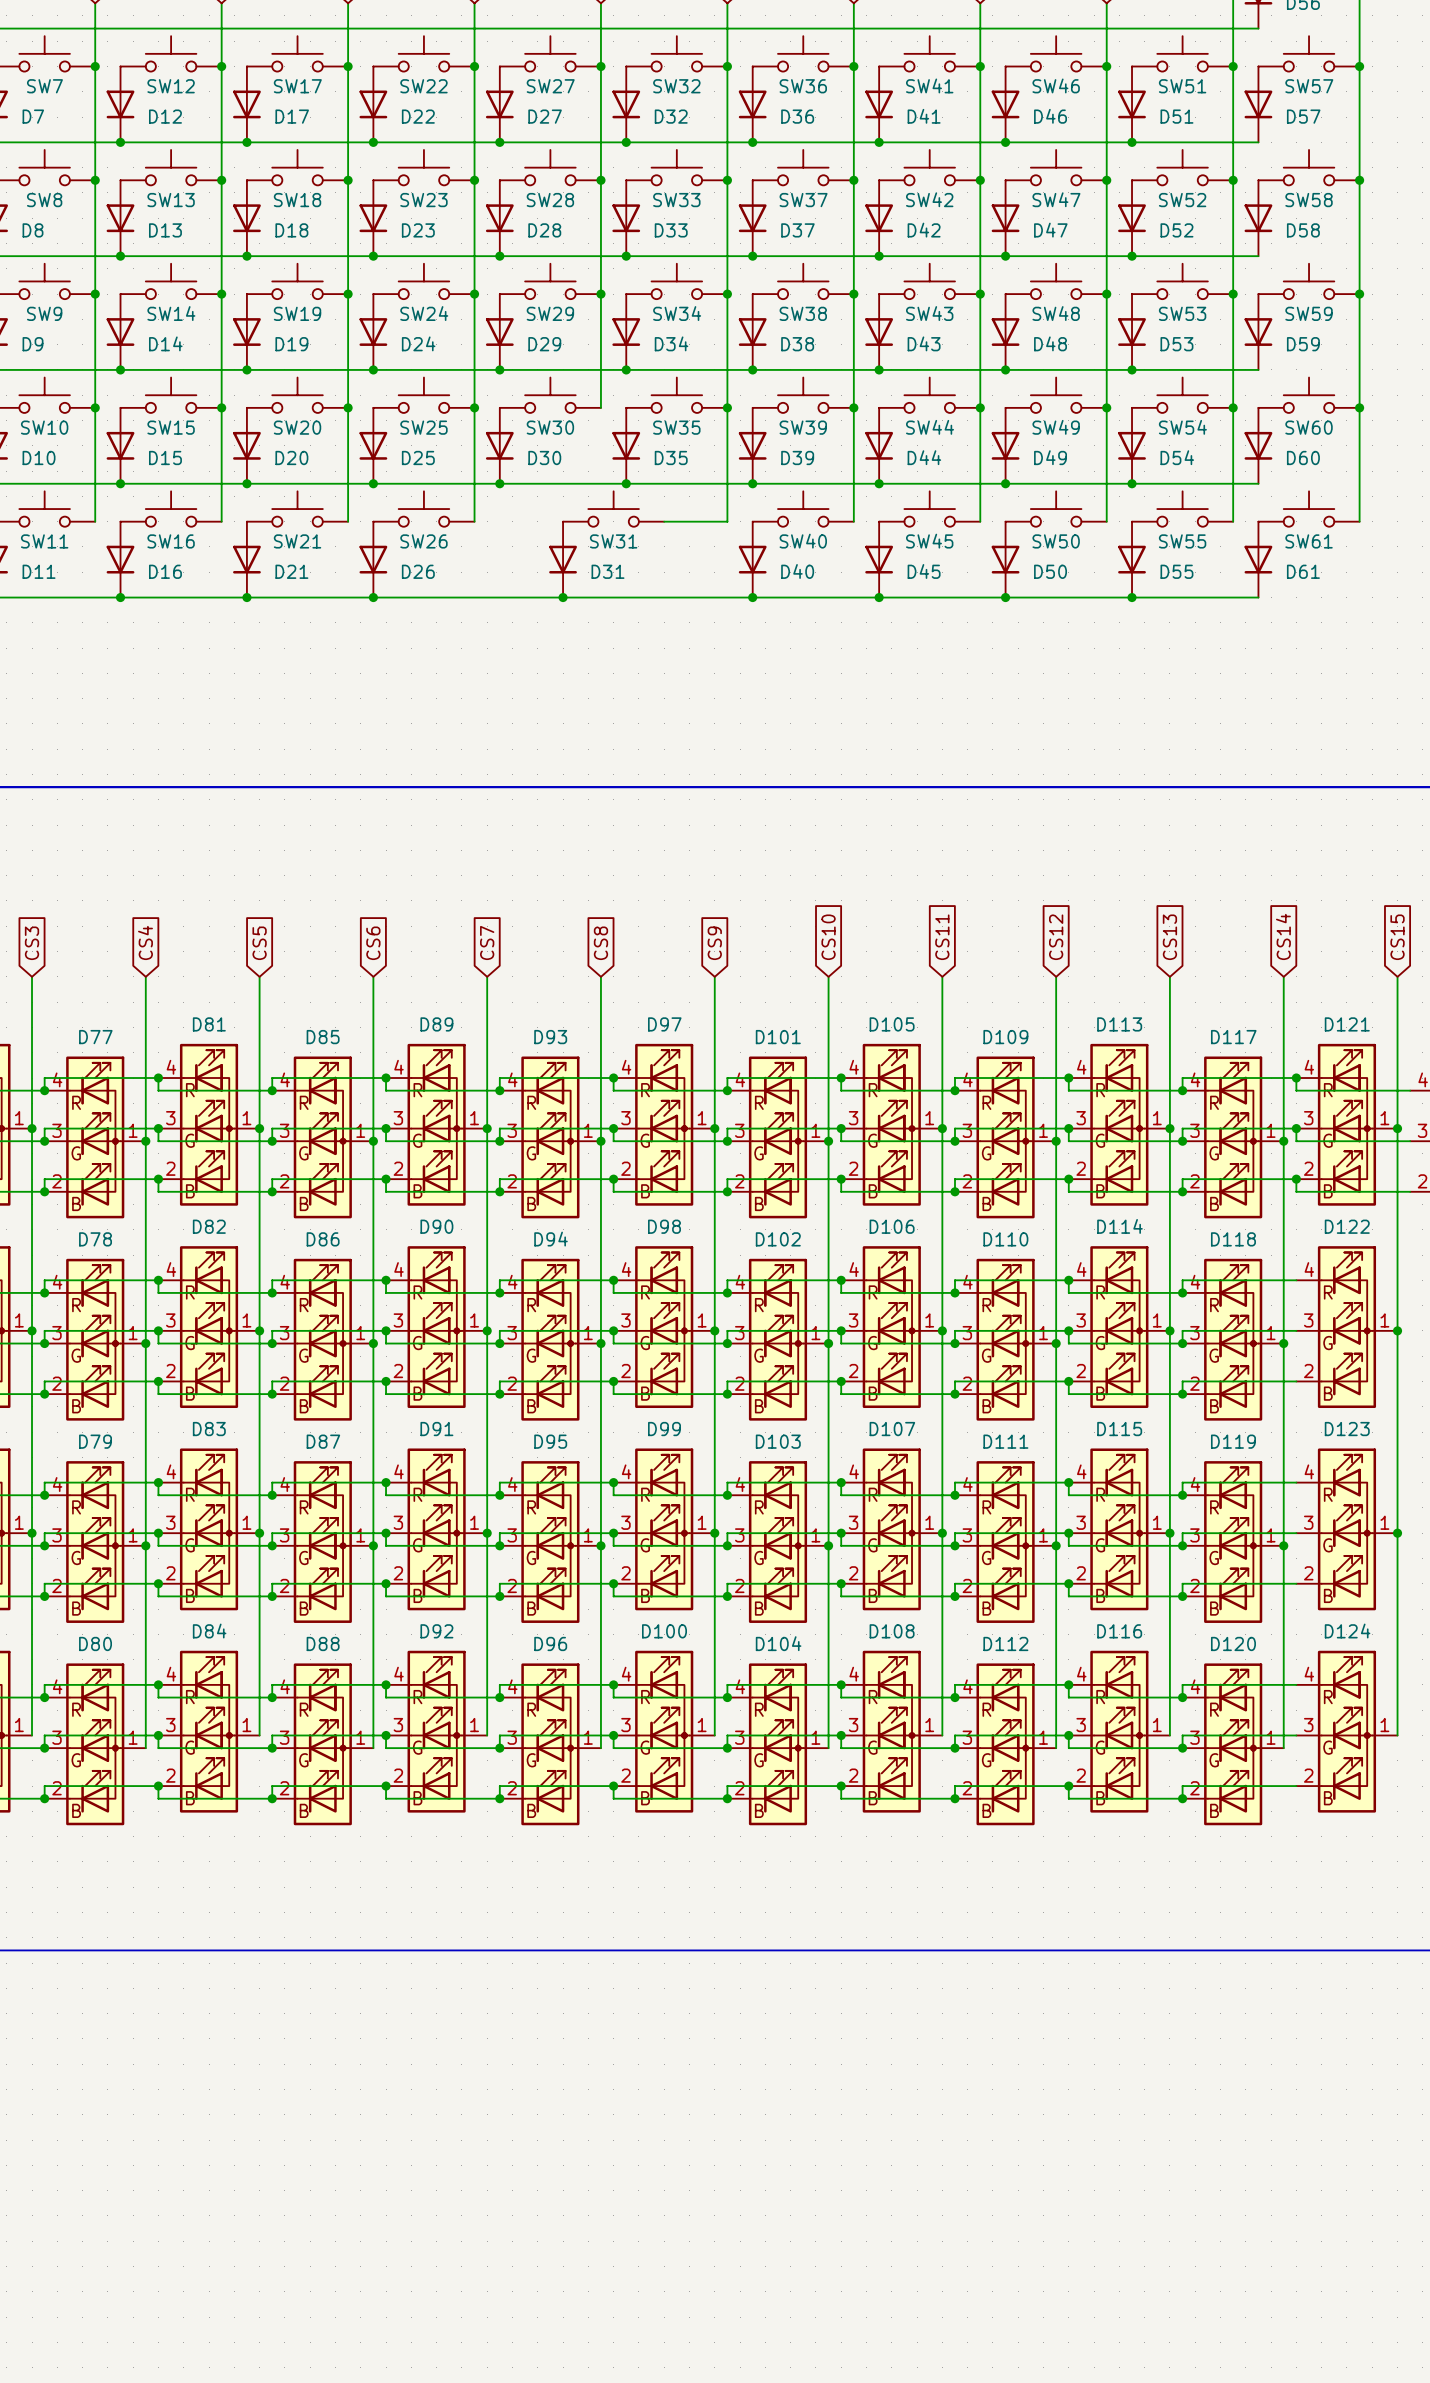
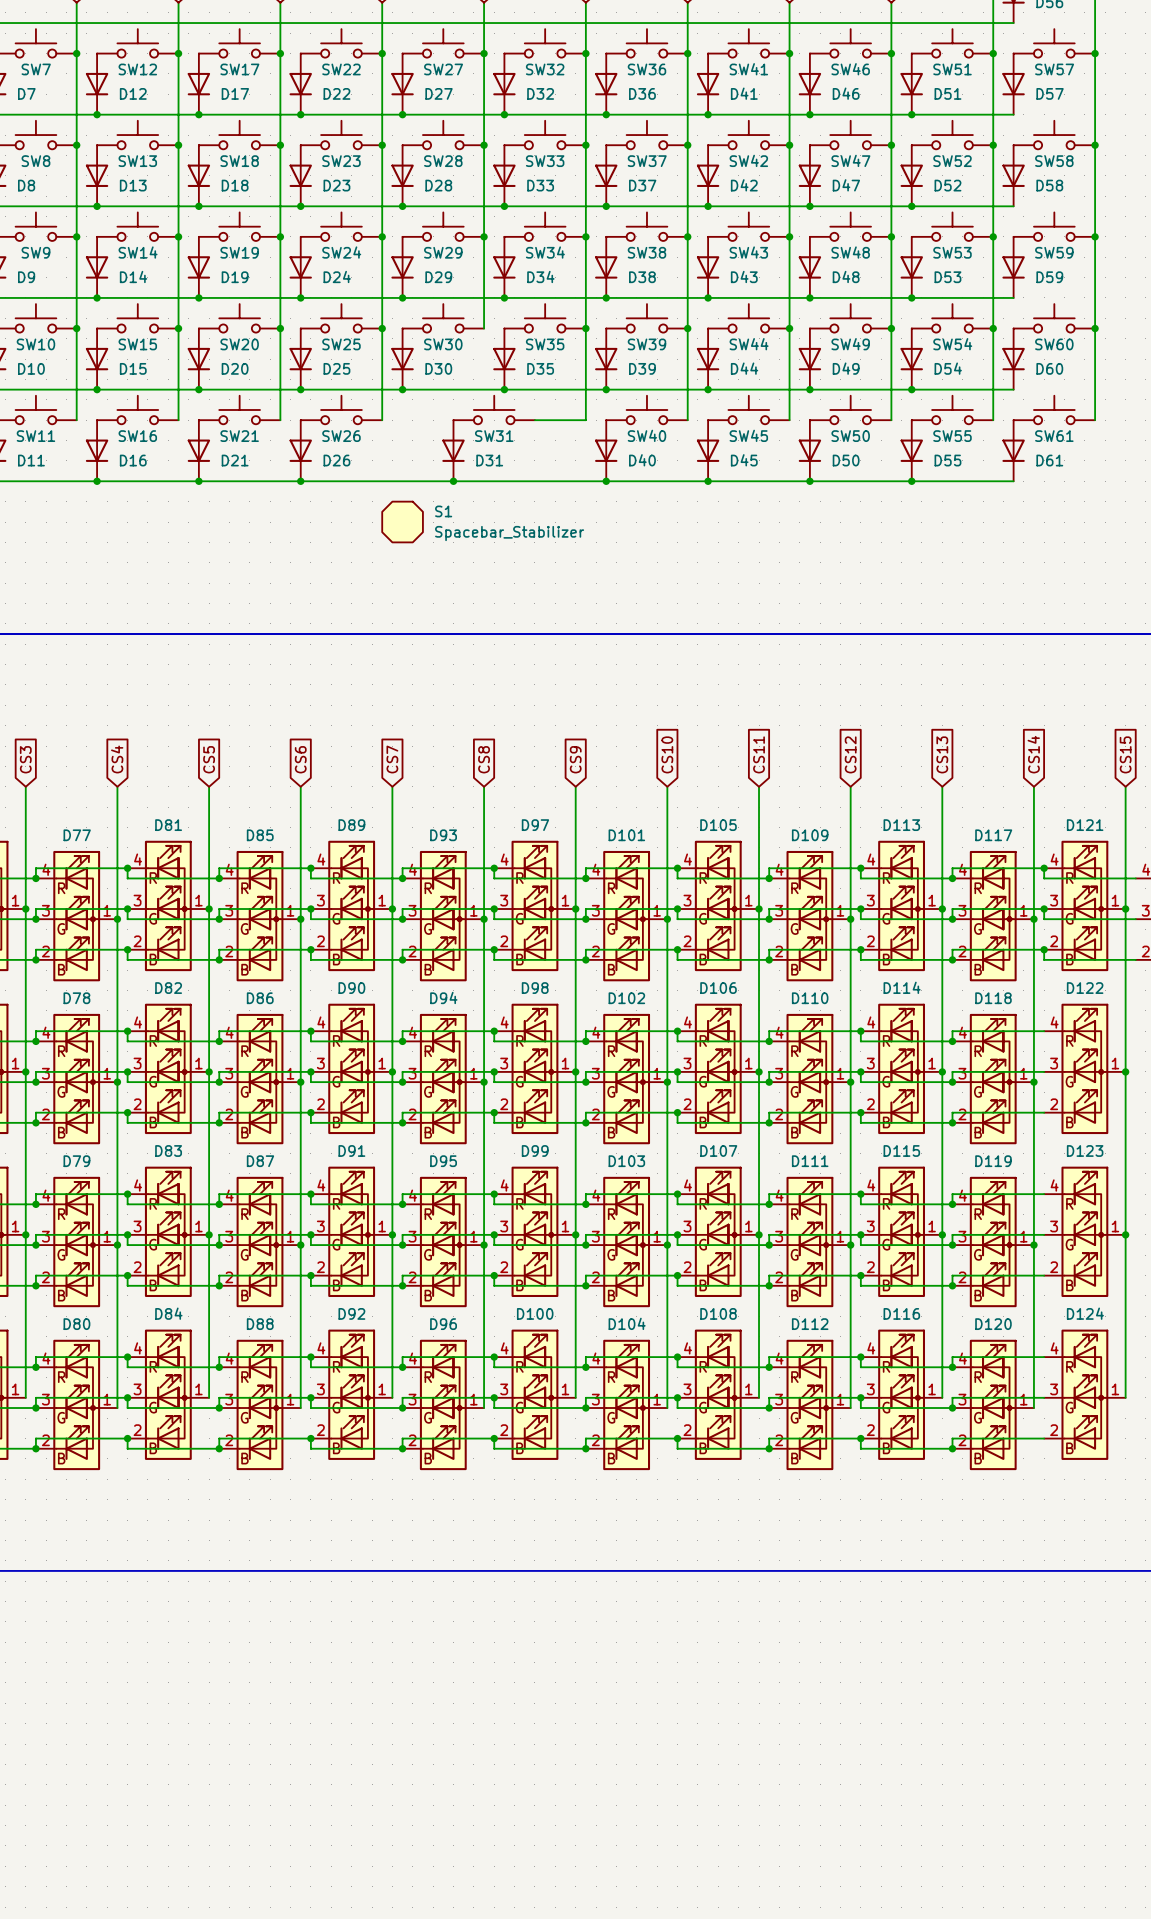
S1: none -> Spacebar_Stabilizer (402, 522)

